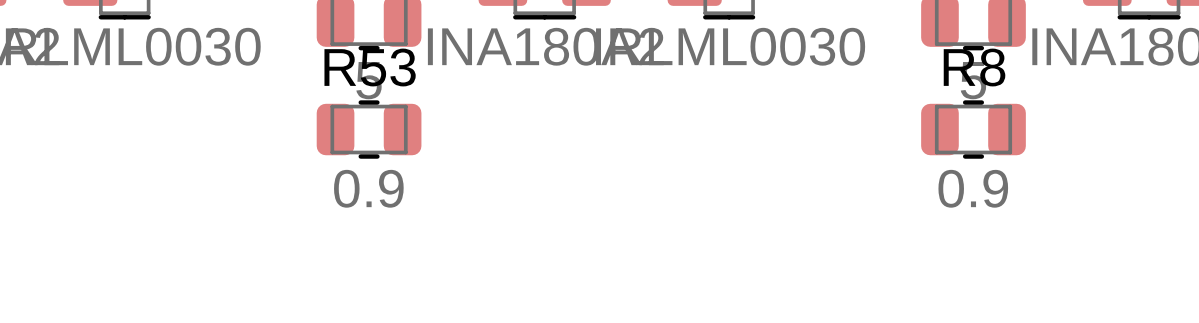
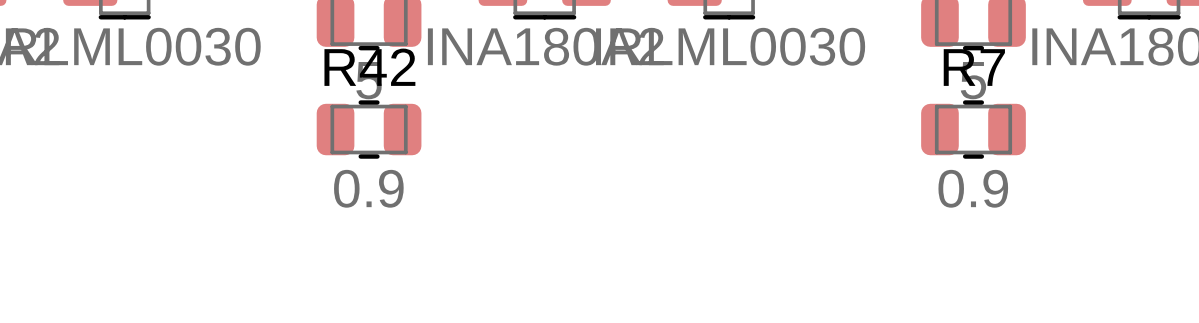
R53 name: R53 (370, 67) -> R42 (369, 67)
R8 name: R8 (974, 67) -> R7 (974, 67)

